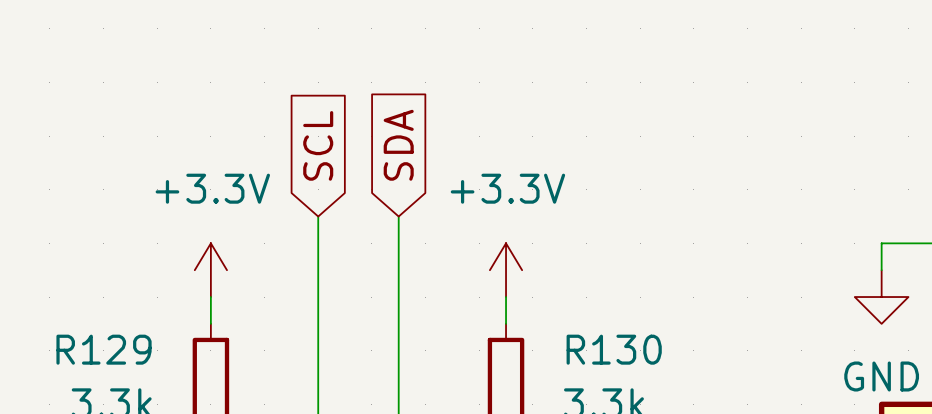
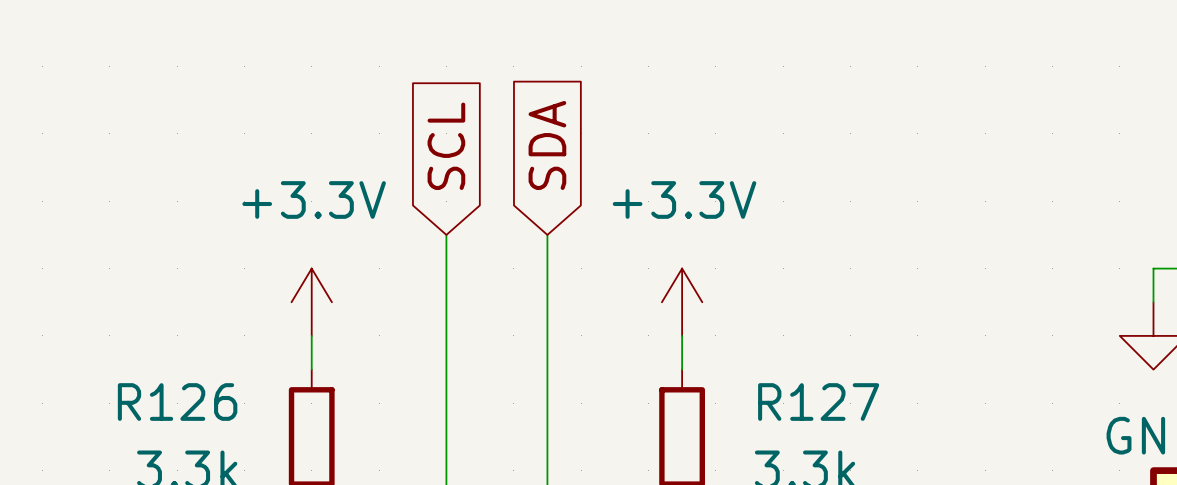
R129 name: R129 (104, 349) -> R126 (177, 402)
R130 name: R130 (614, 349) -> R127 (818, 402)

